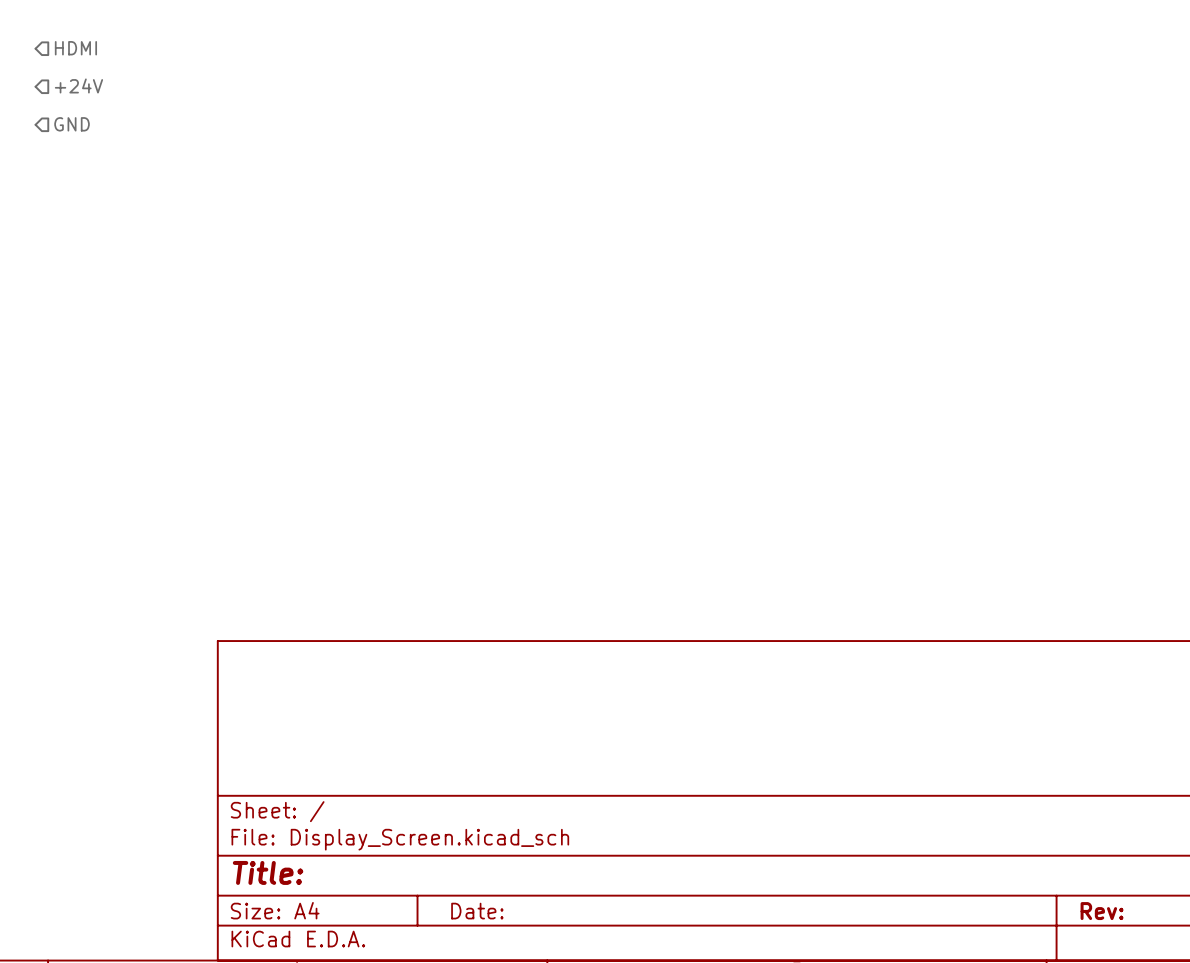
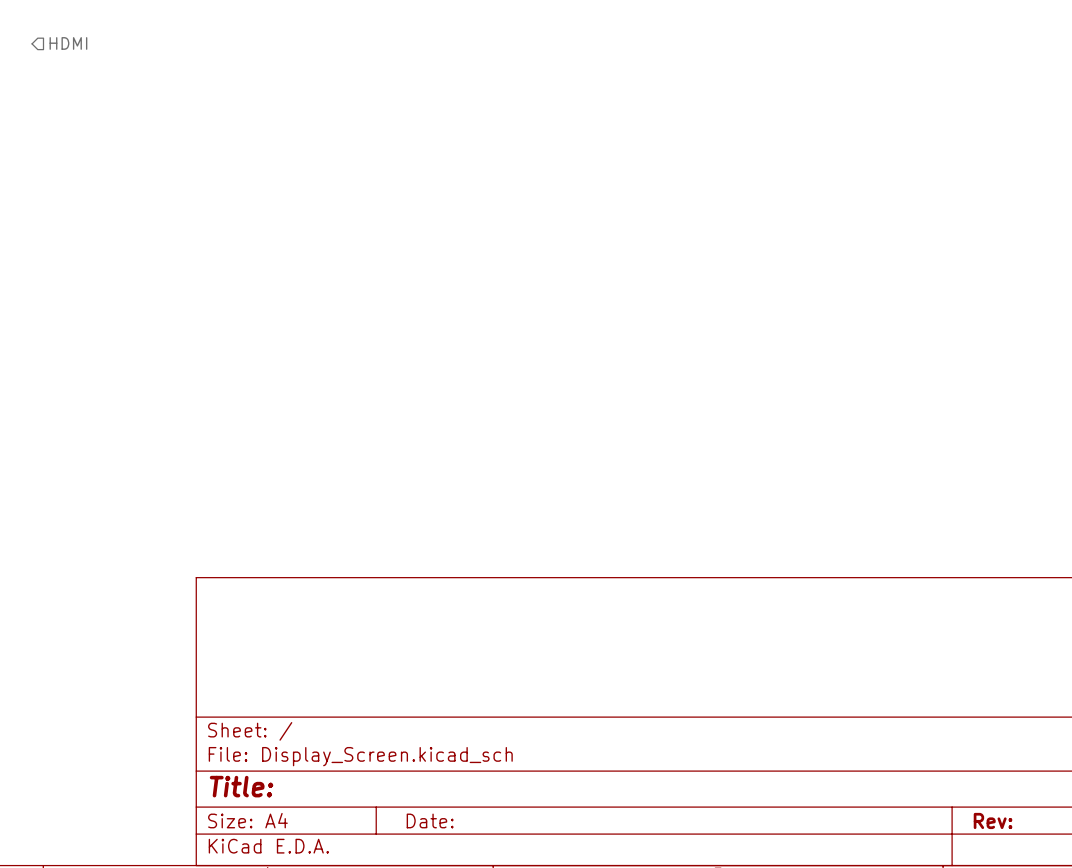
hierarchical label: +24V (78, 85) -> none
hierarchical label: GND (72, 124) -> none

